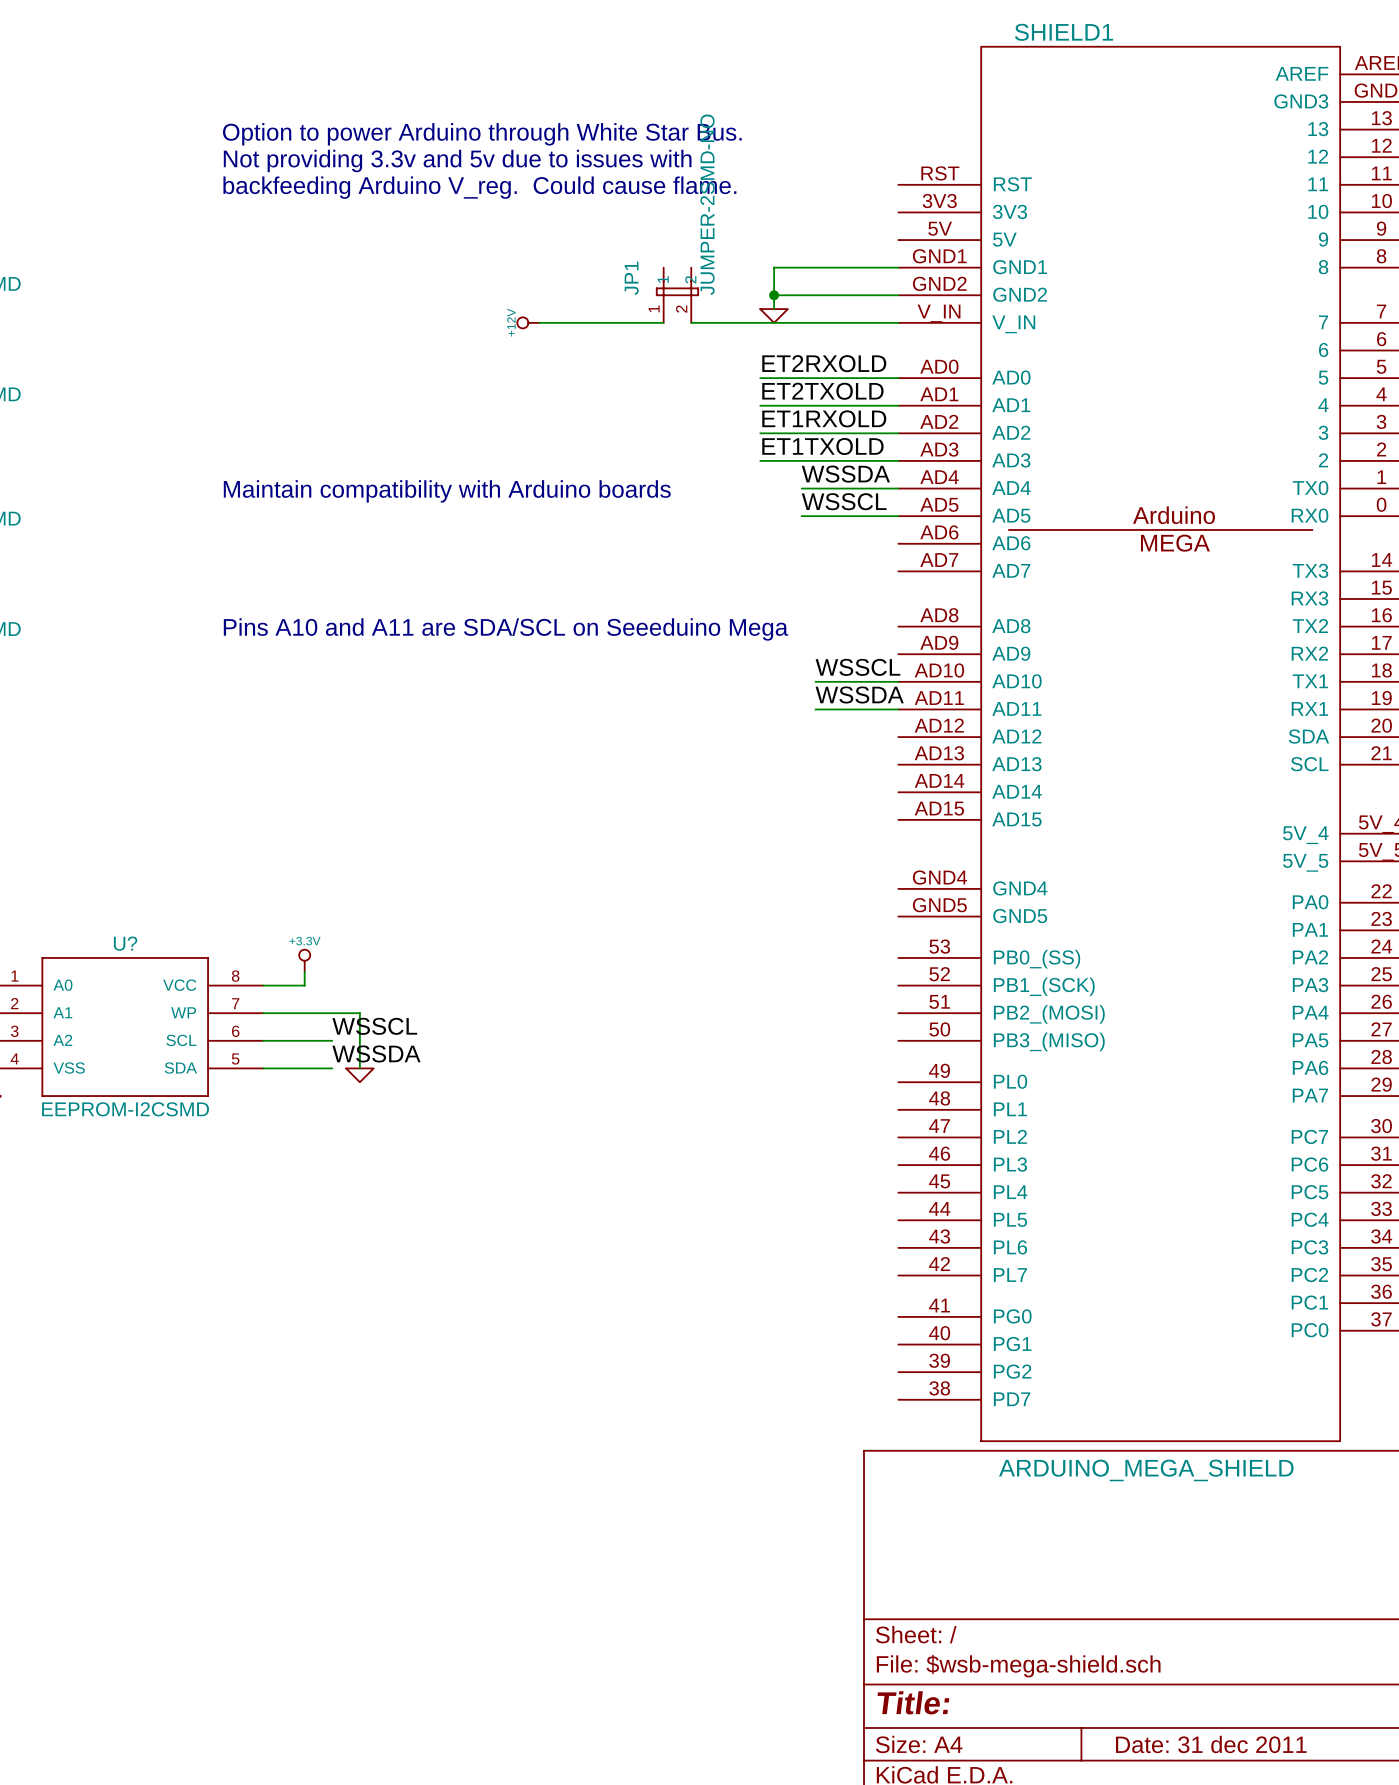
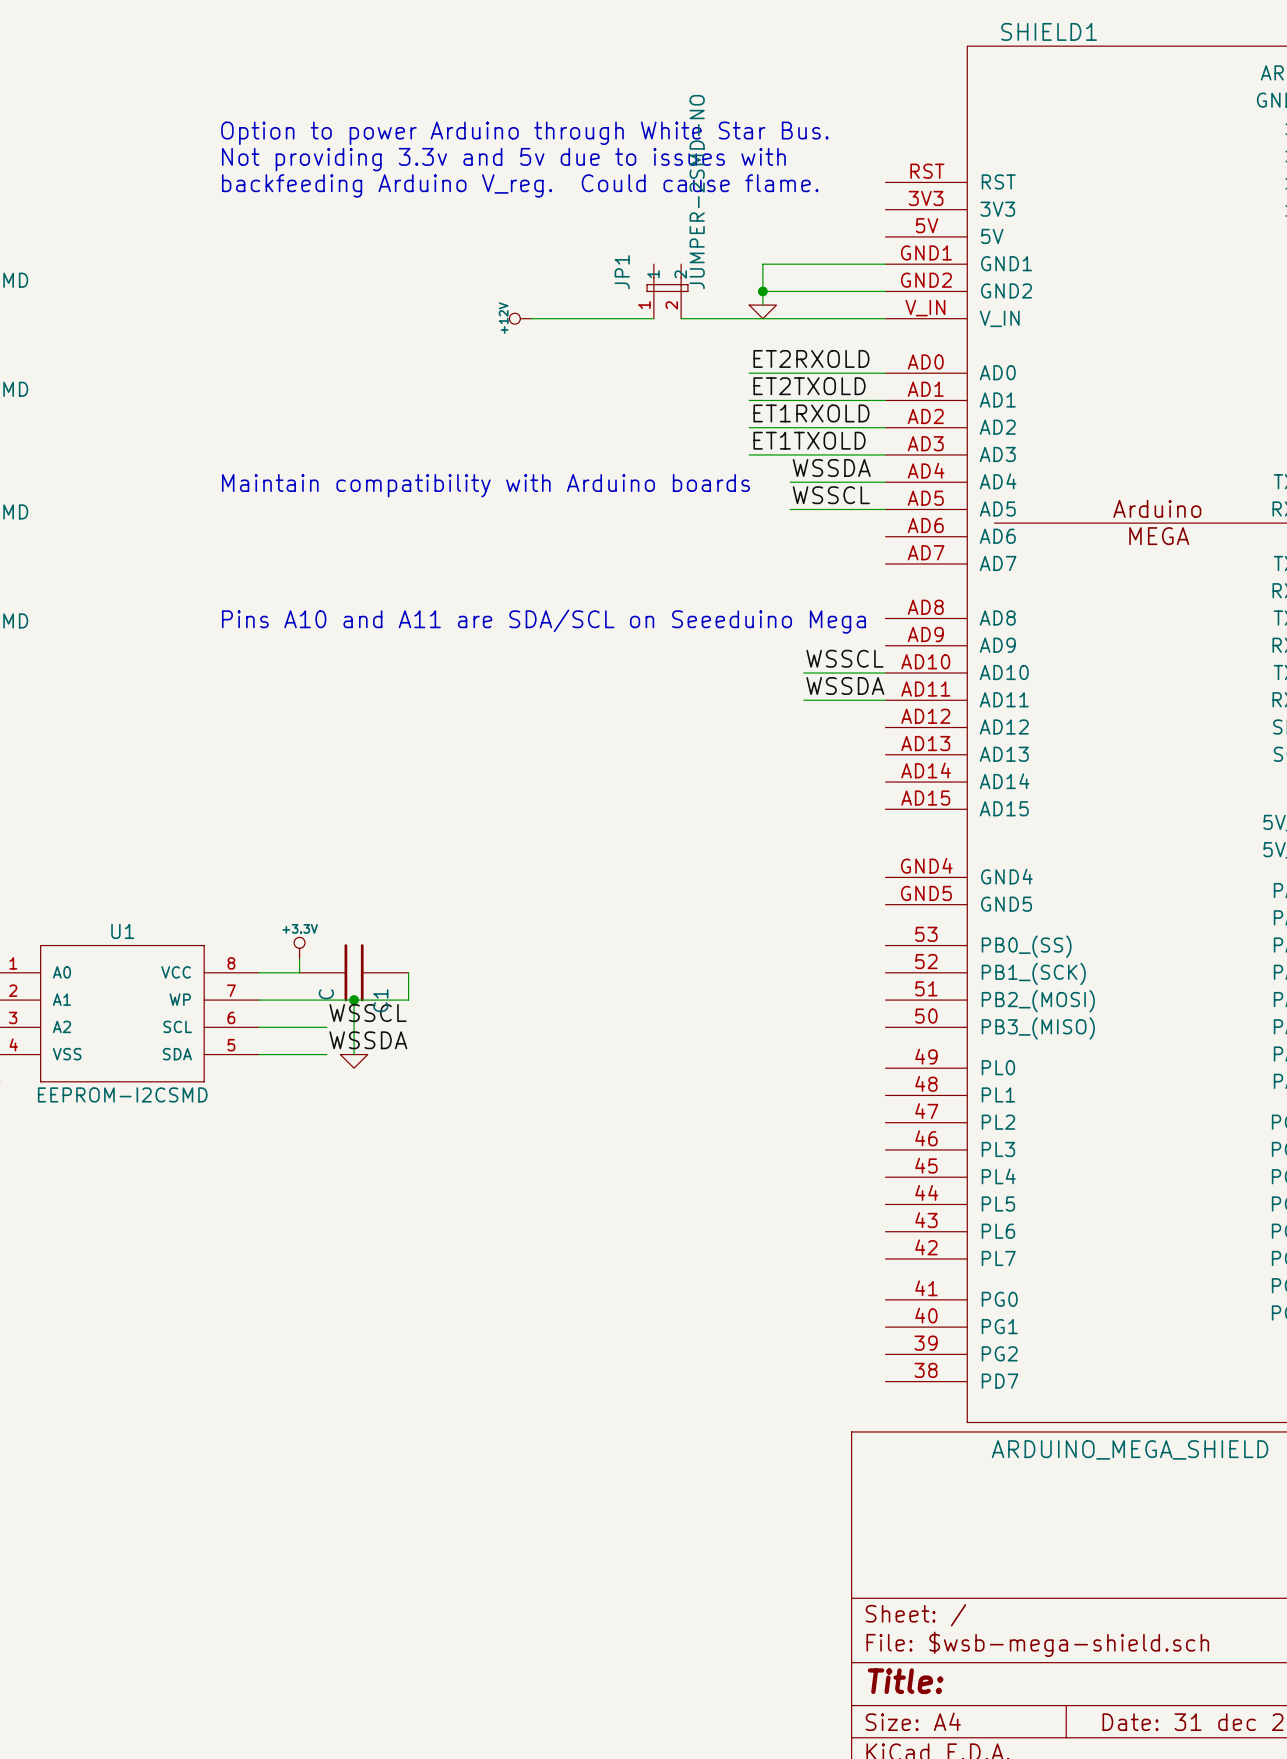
U? name: U? (125, 943) -> U1 (122, 931)
C1: none -> C (354, 972)
wire: none -> (408, 972) (408, 1000) (354, 1000)
junction: none -> (354, 1000)

